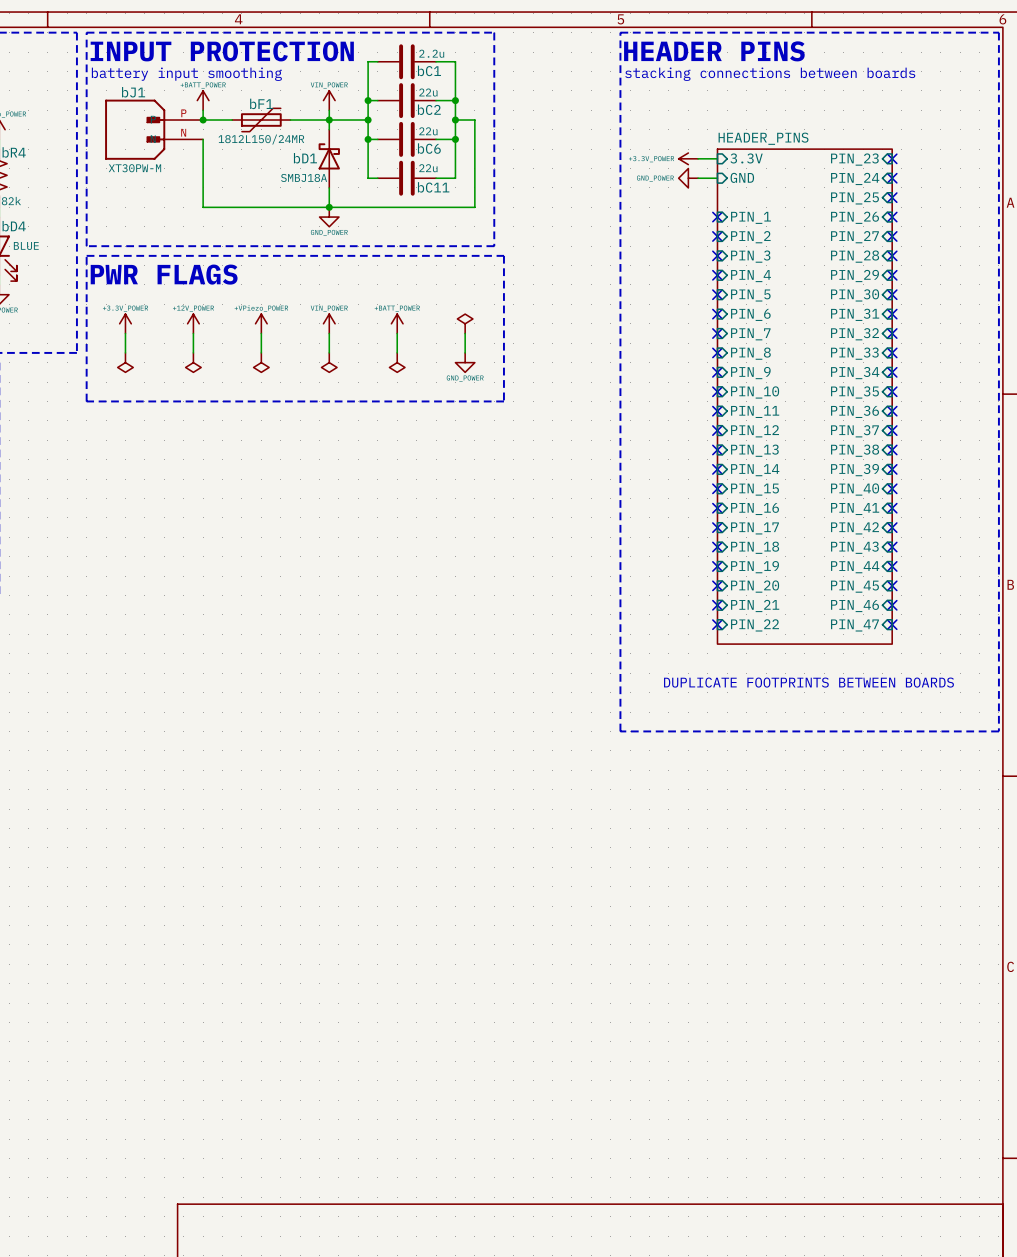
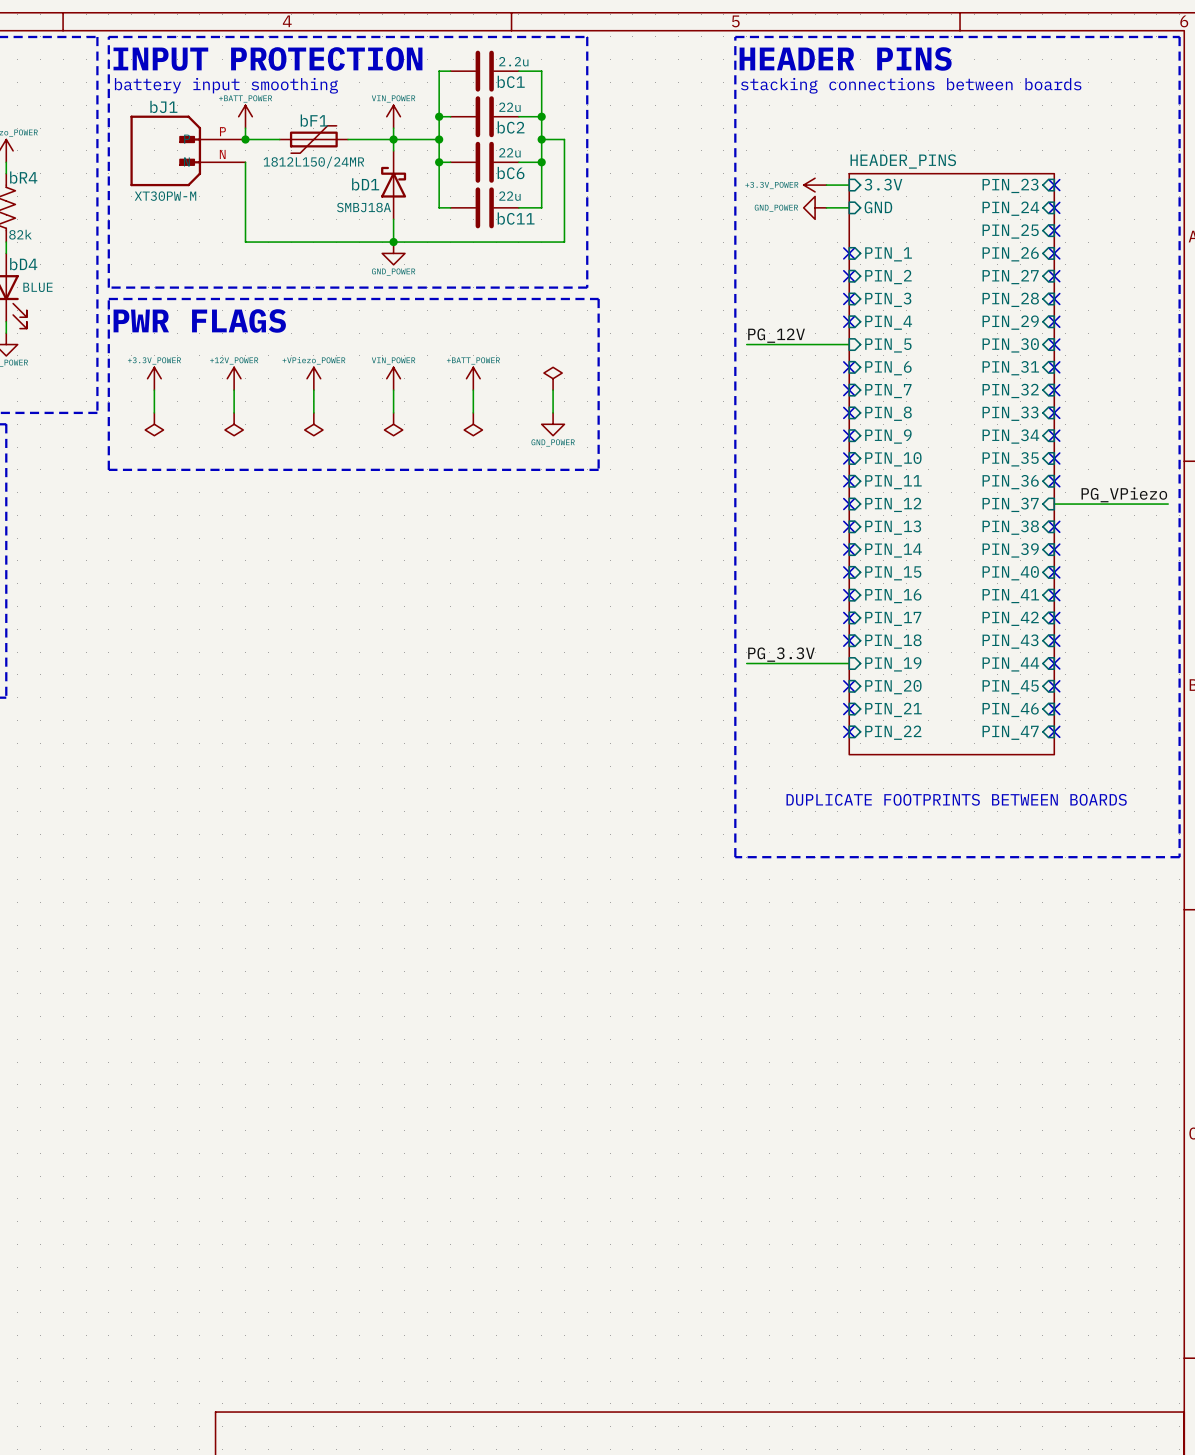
label: none -> PG_12V (776, 335)
wire: none -> (746, 344) (849, 344)
no-connect mark: (717, 294) -> none
label: none -> PG_VPiezo (1124, 494)
wire: none -> (1054, 504) (1168, 504)
no-connect mark: (892, 430) -> none
label: none -> PG_3.3V (781, 654)
wire: none -> (746, 663) (849, 663)
no-connect mark: (717, 566) -> none

